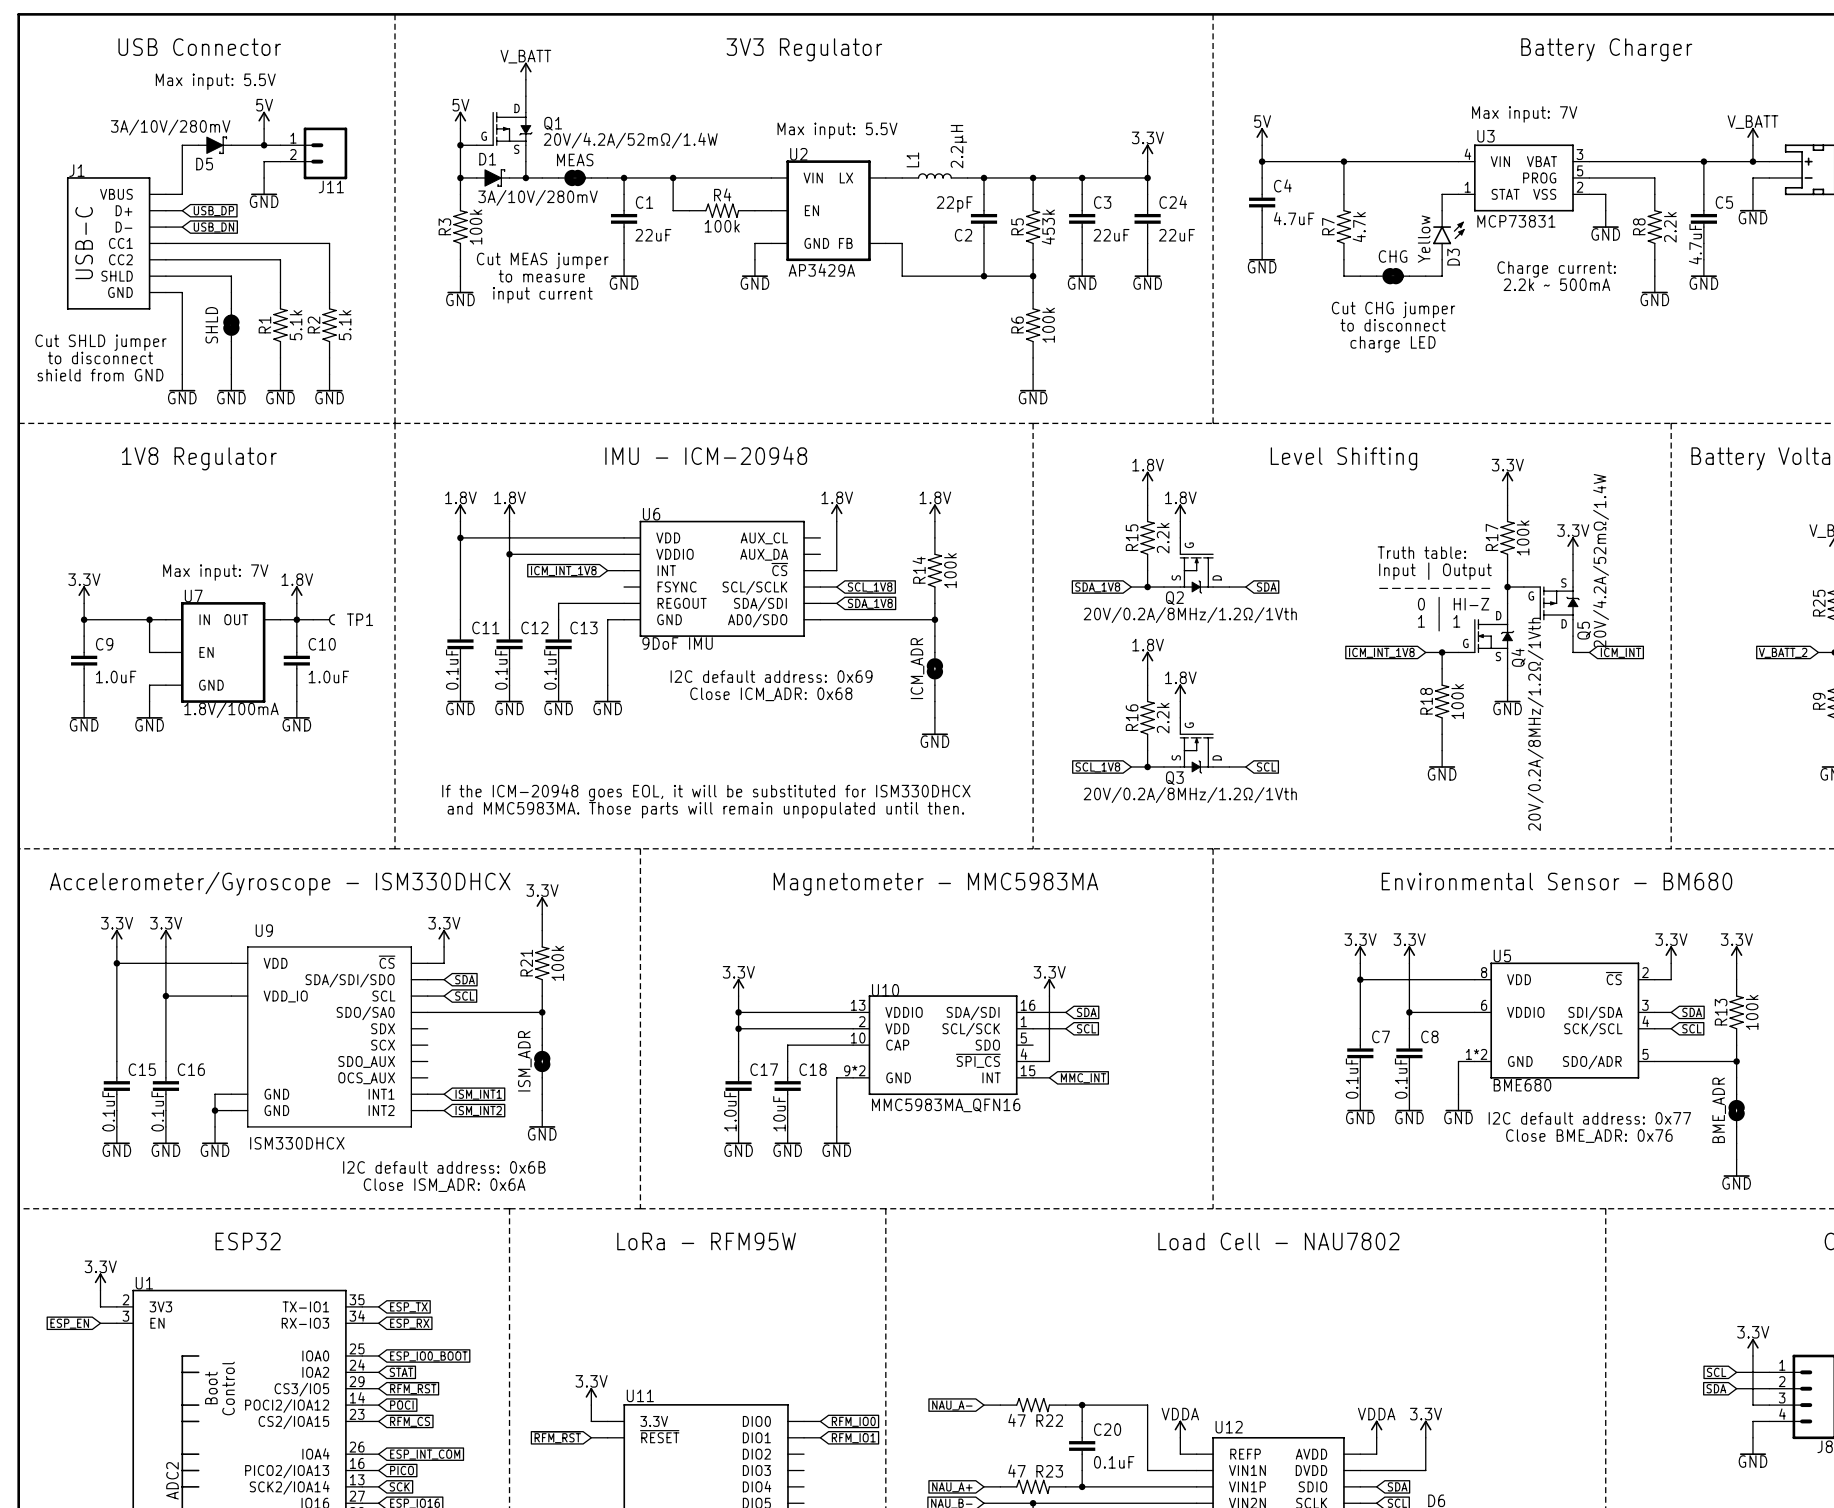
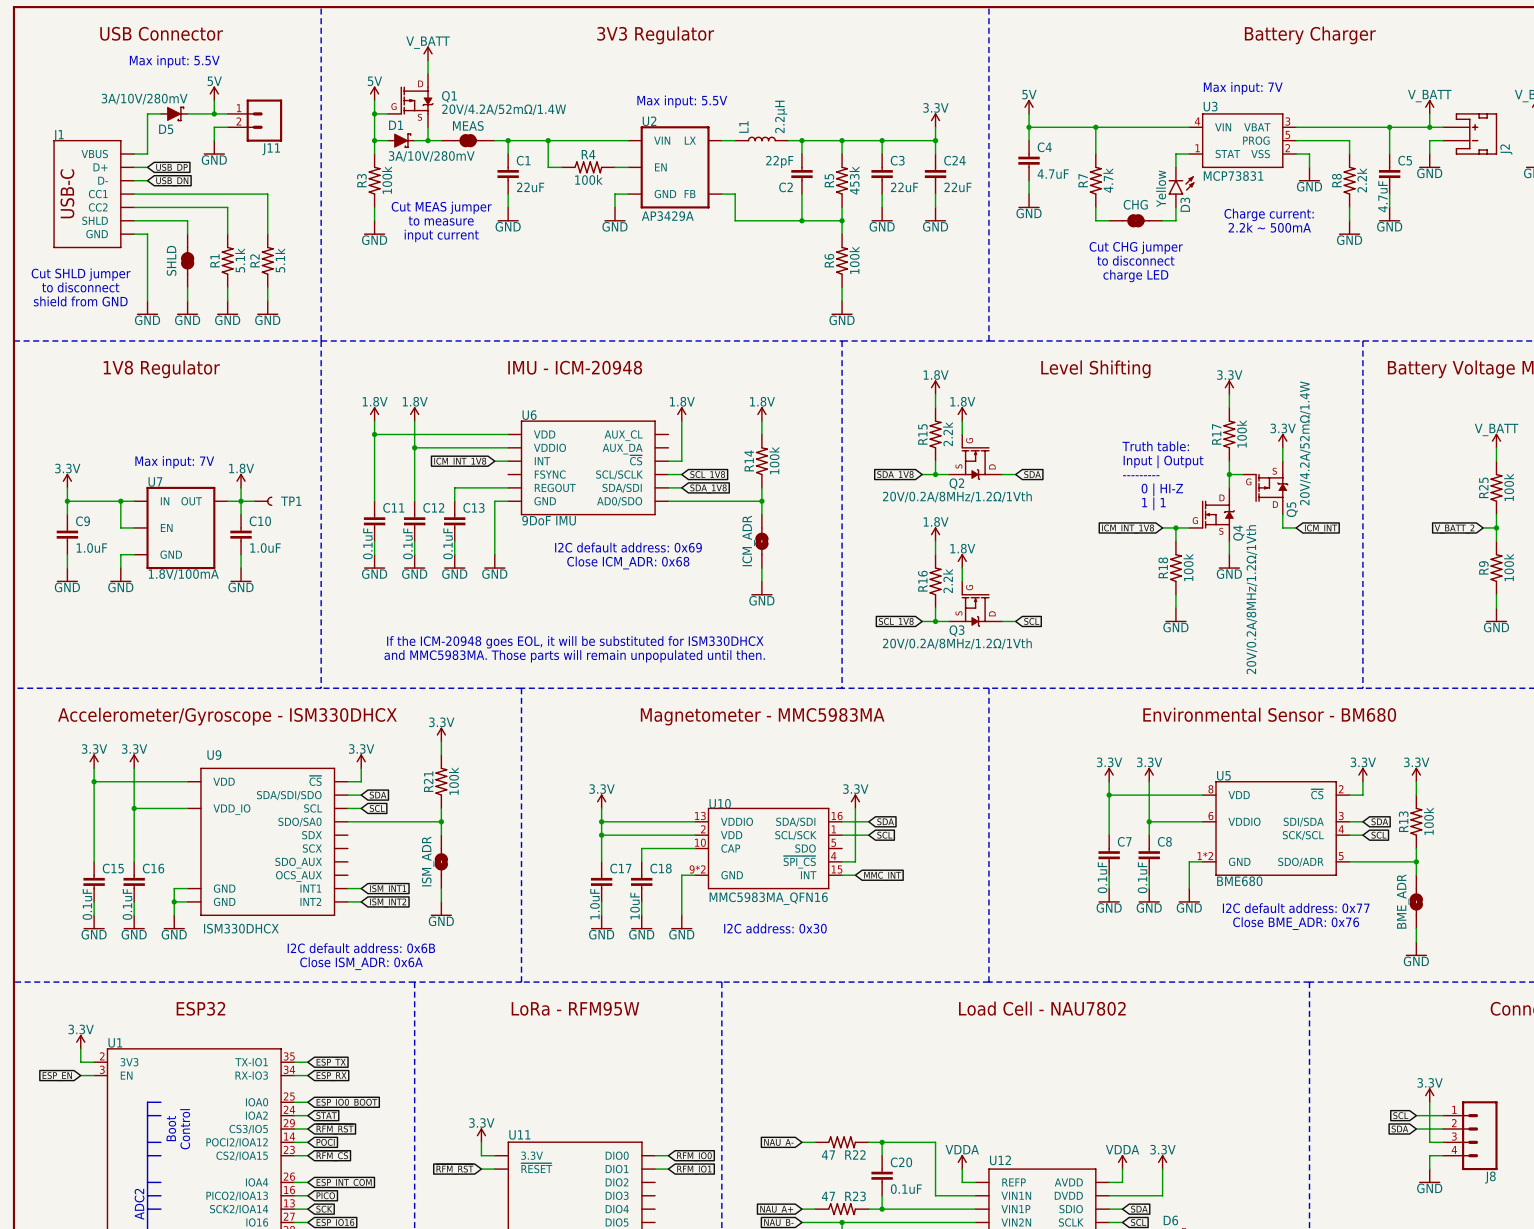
text: none -> I2C address: 0x30 (775, 928)

